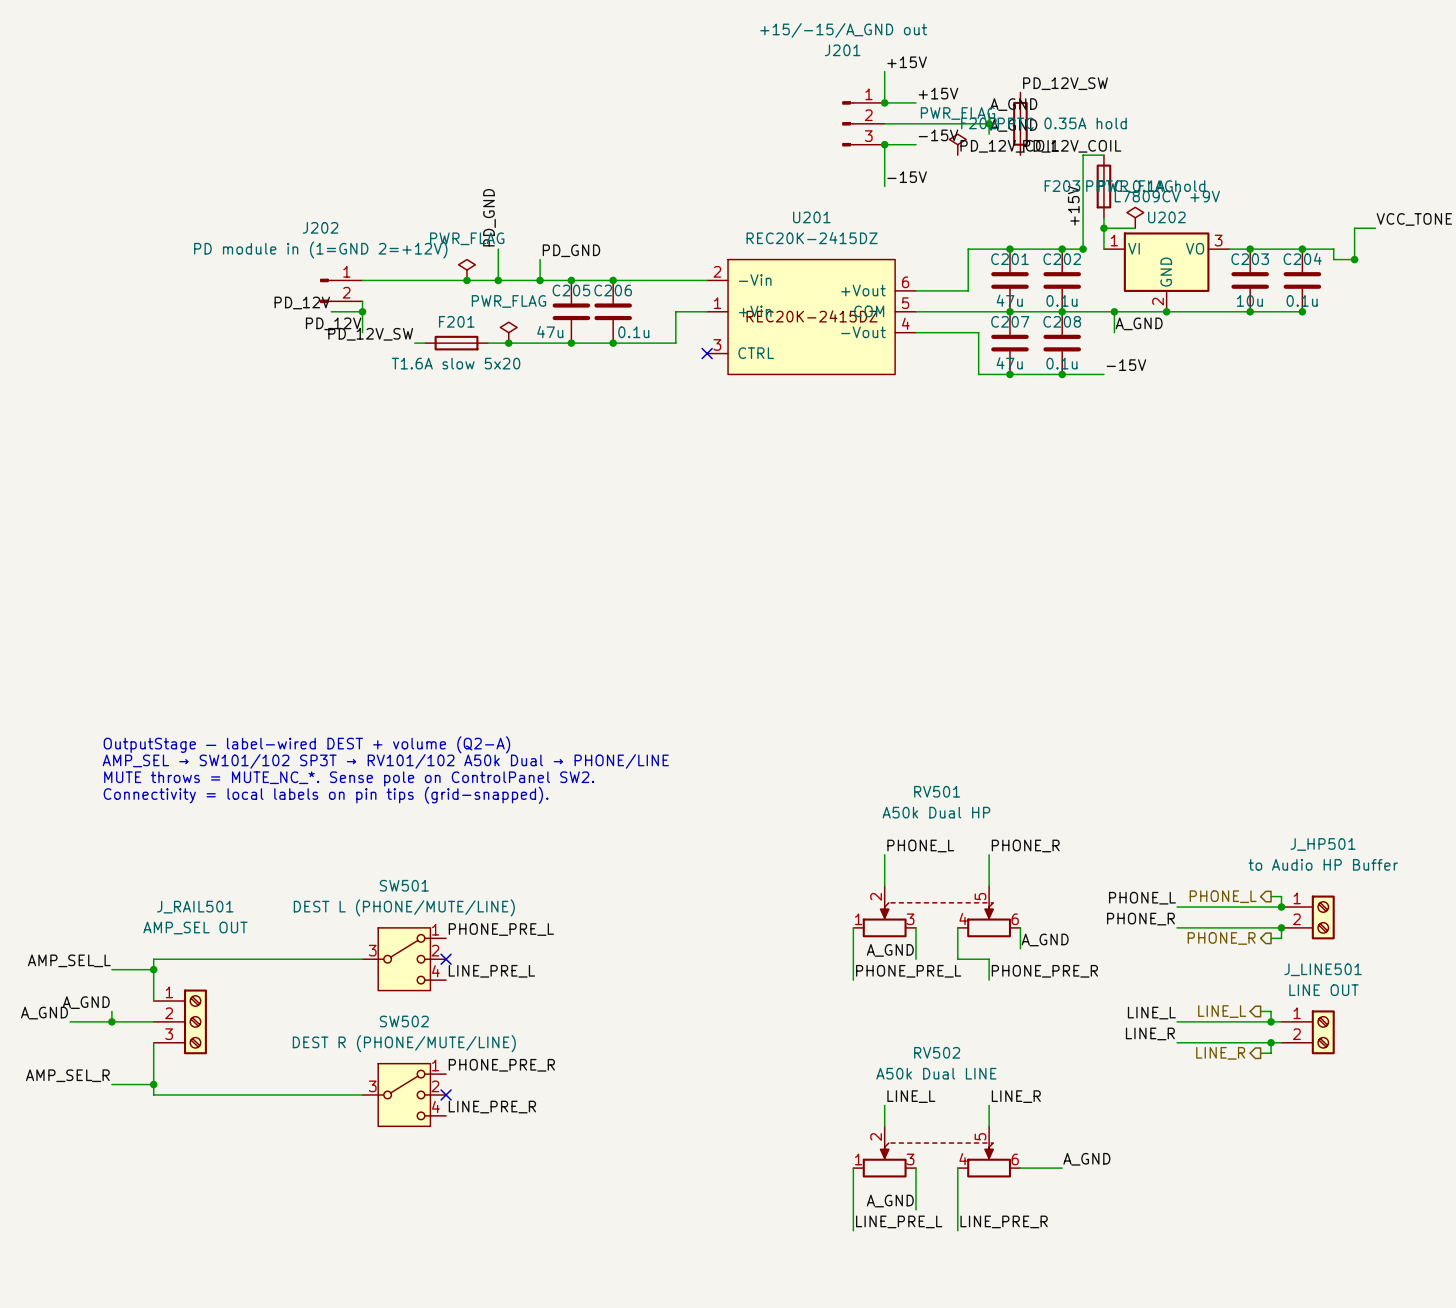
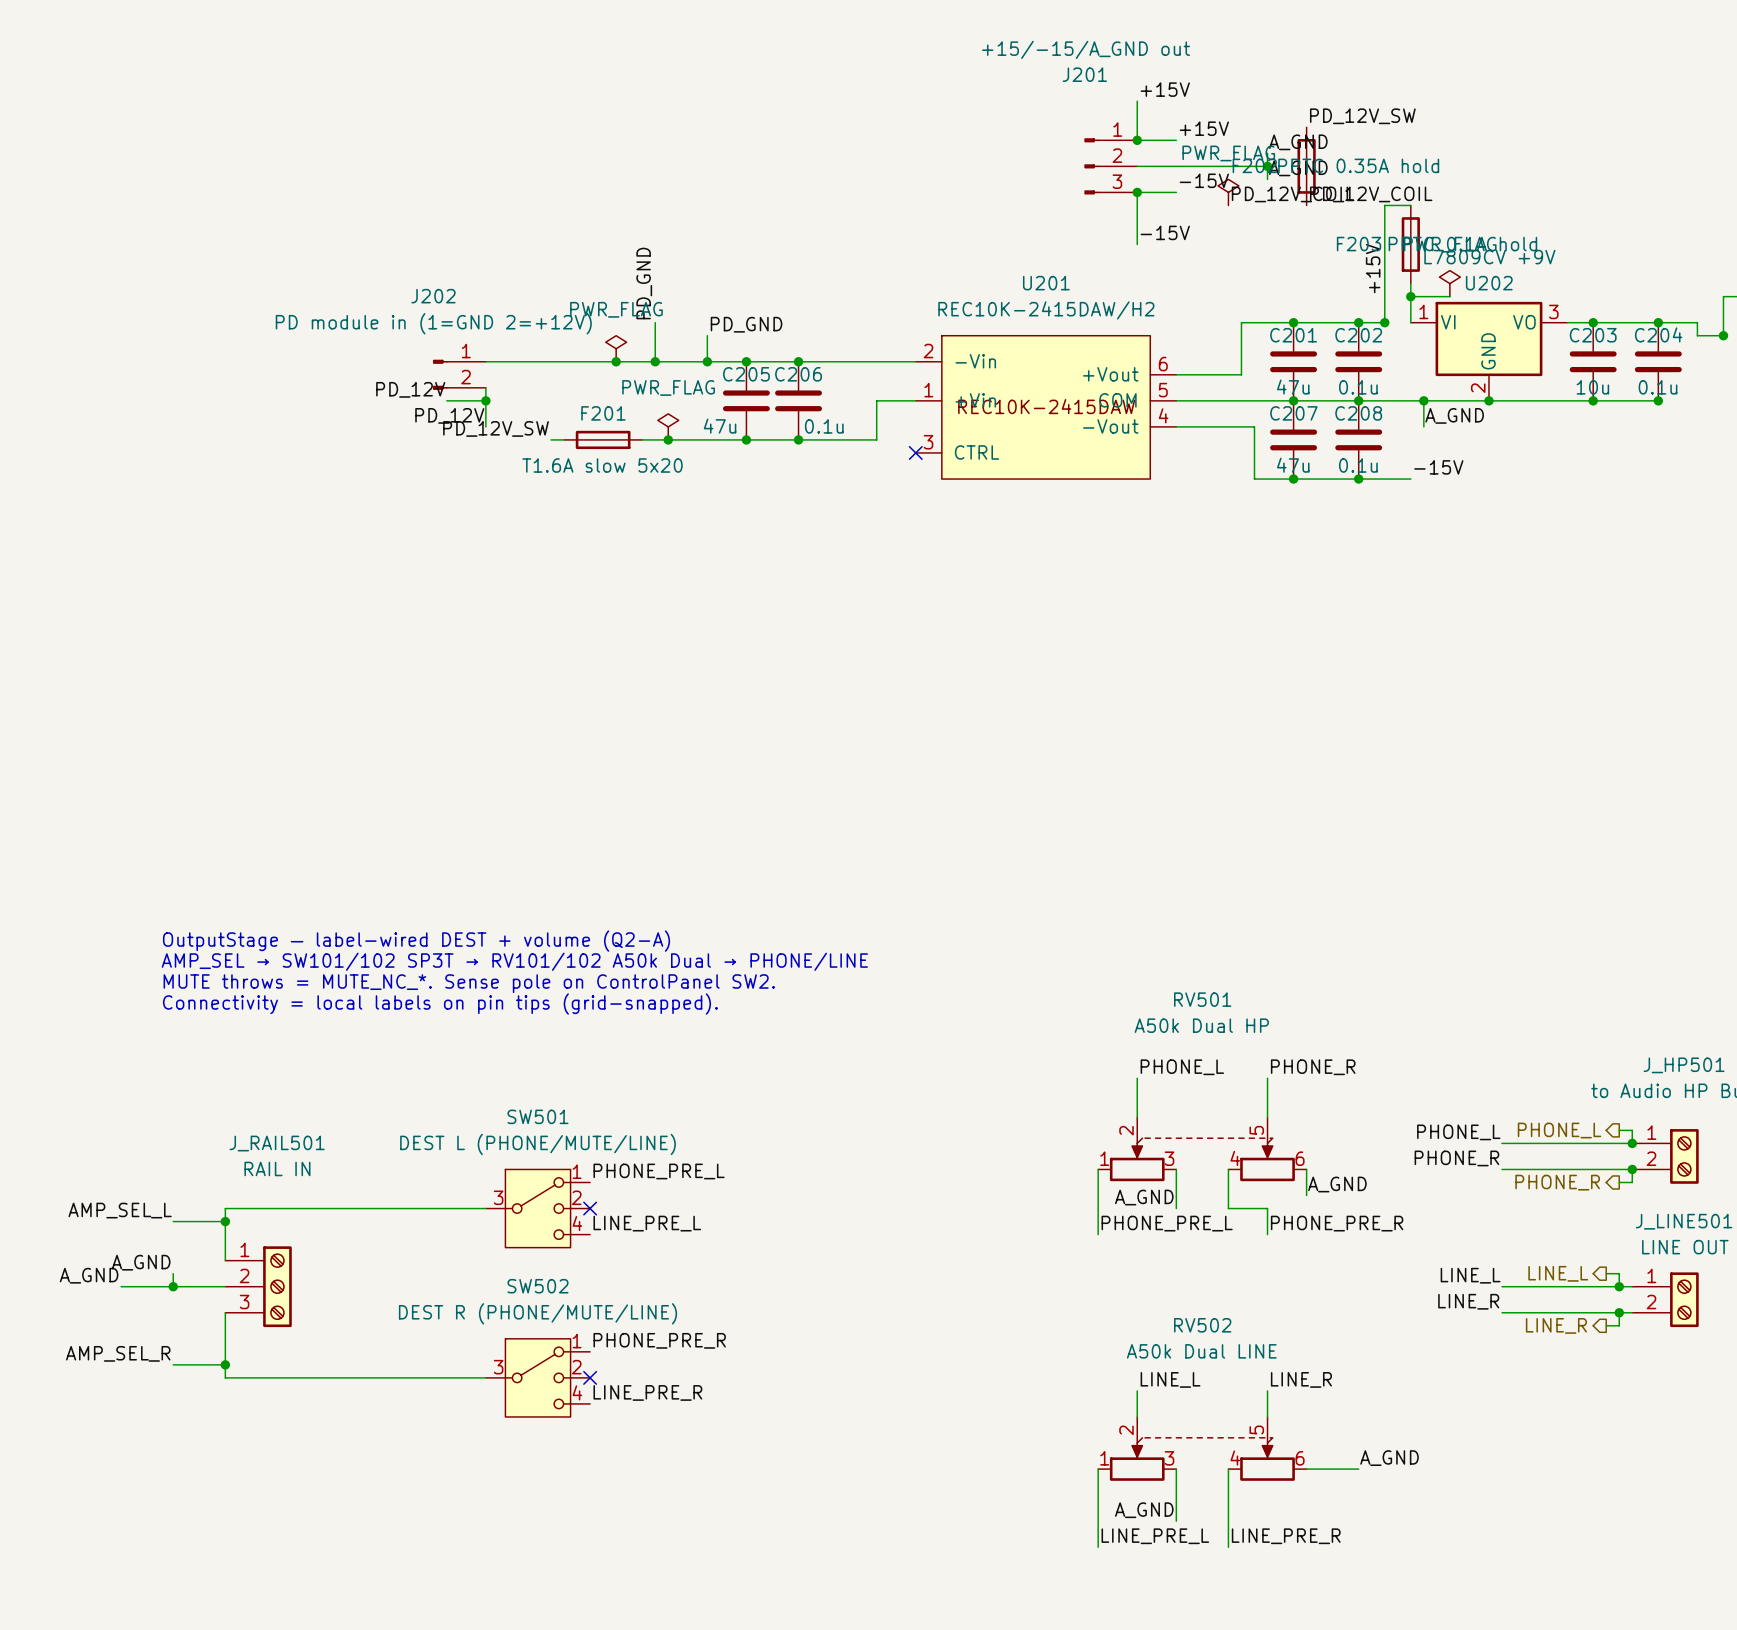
U201 value: REC20K-2415DZ (812, 238) -> REC10K-2415DAW/H2 (1046, 310)
U201 text: REC20K-2415DZ (812, 316) -> REC10K-2415DAW (1046, 406)
J_RAIL501 value: AMP_SEL OUT (195, 928) -> RAIL IN (277, 1168)

